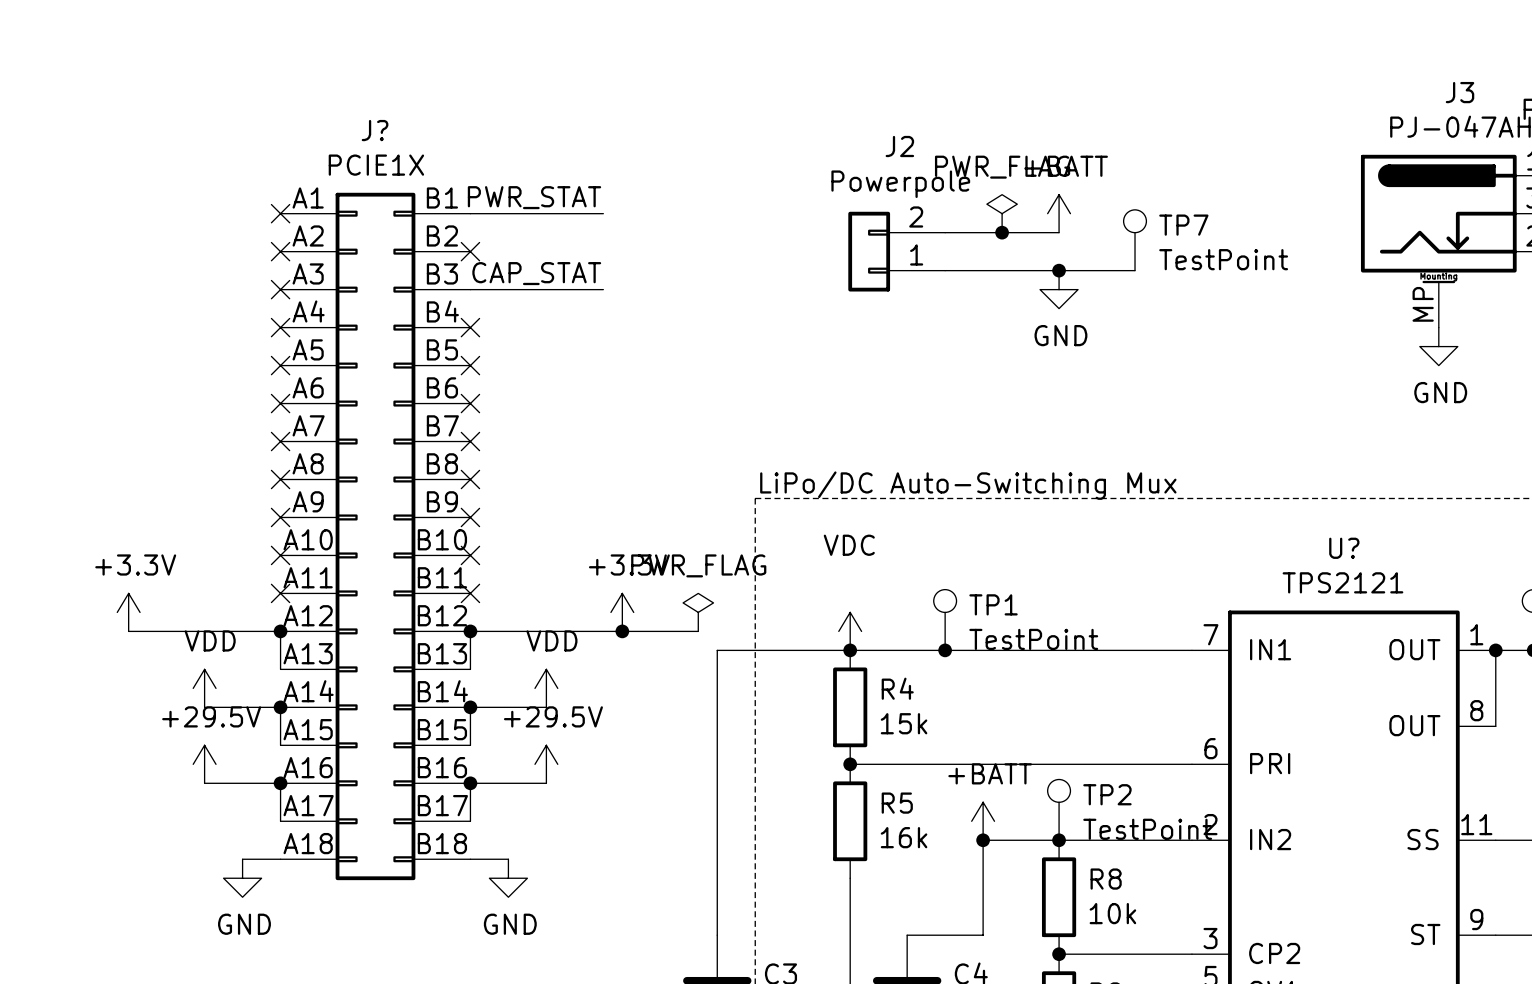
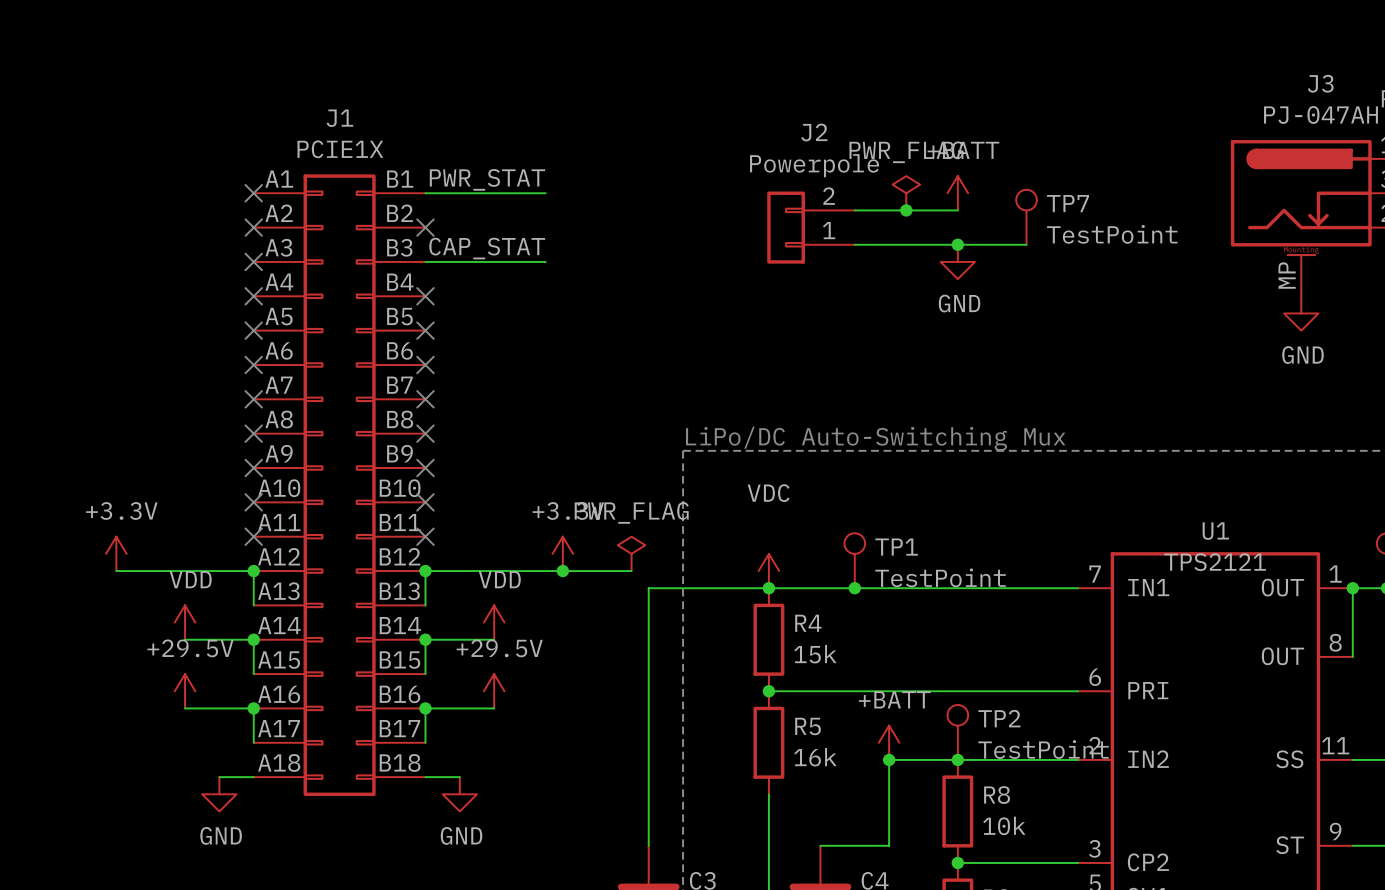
J? name: J? (375, 130) -> J1 (339, 118)
U? name: U? (1344, 548) -> U1 (1215, 531)
U? value position: TPS2121 (1342, 582) -> TPS2121 (1215, 562)

